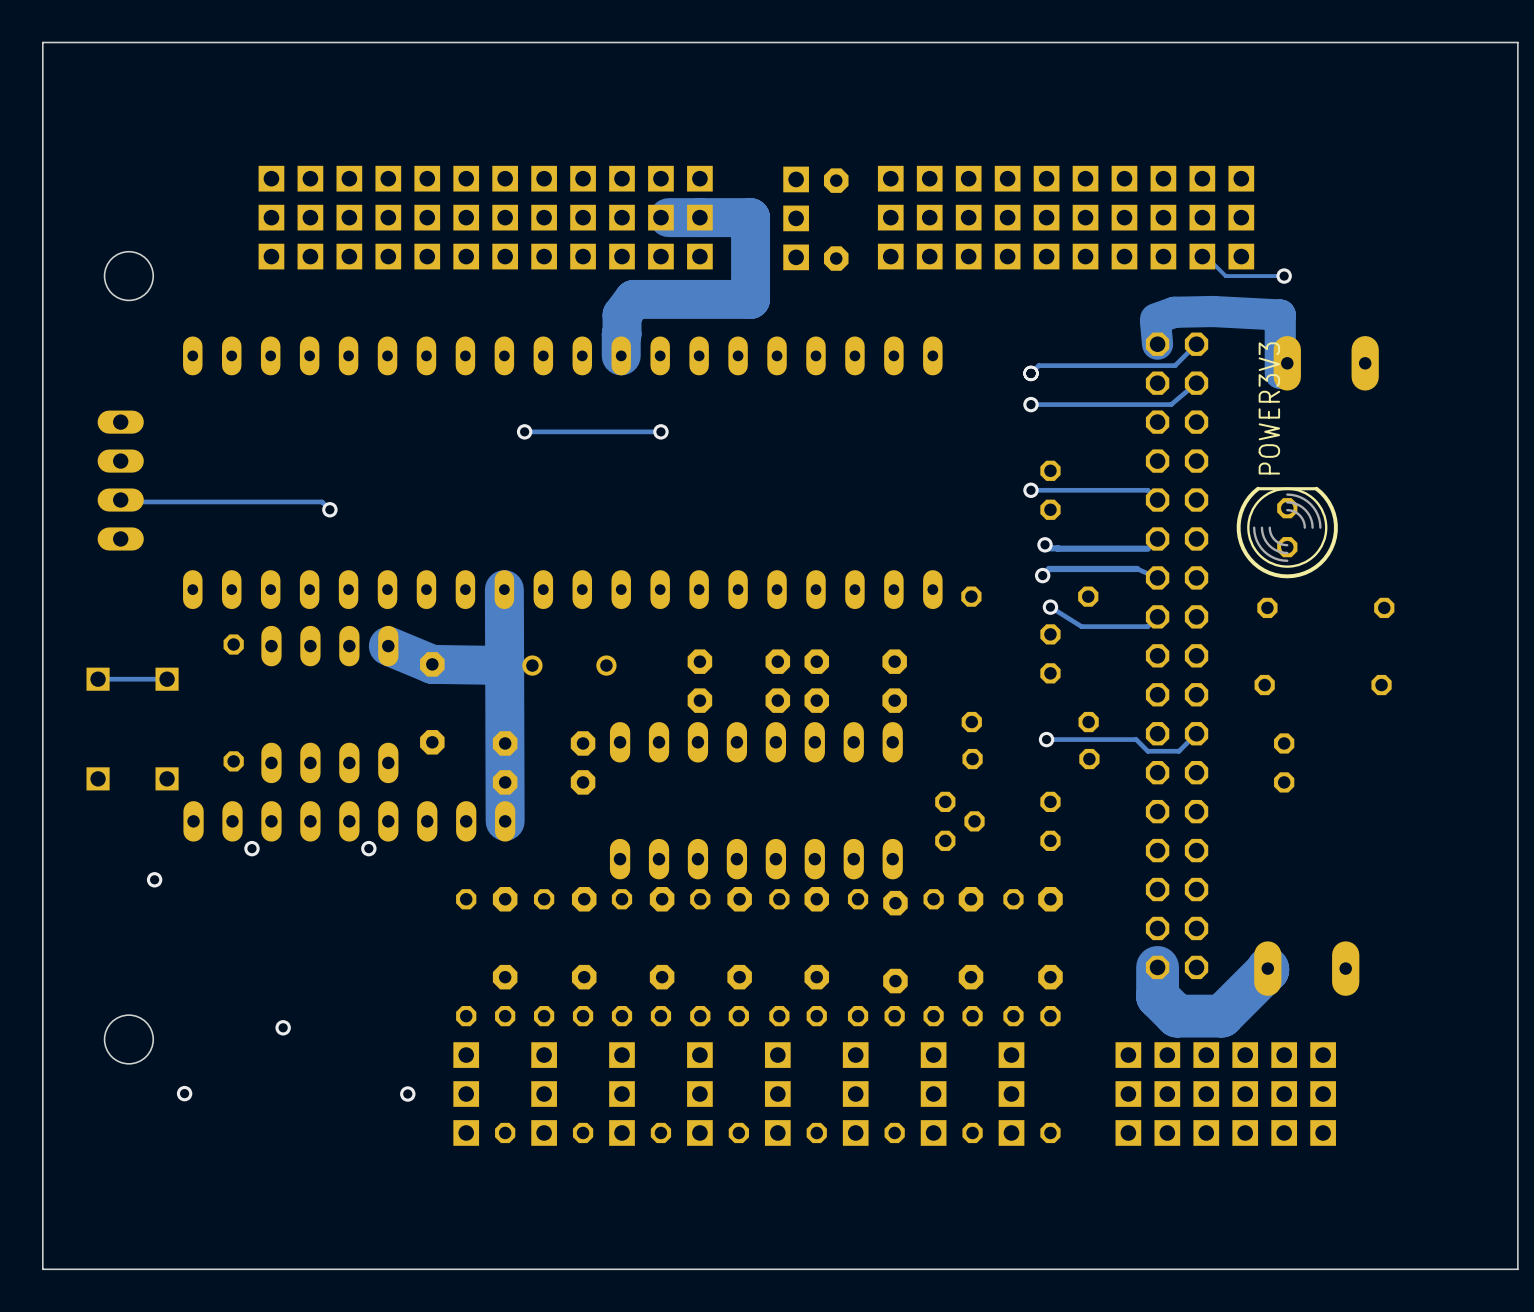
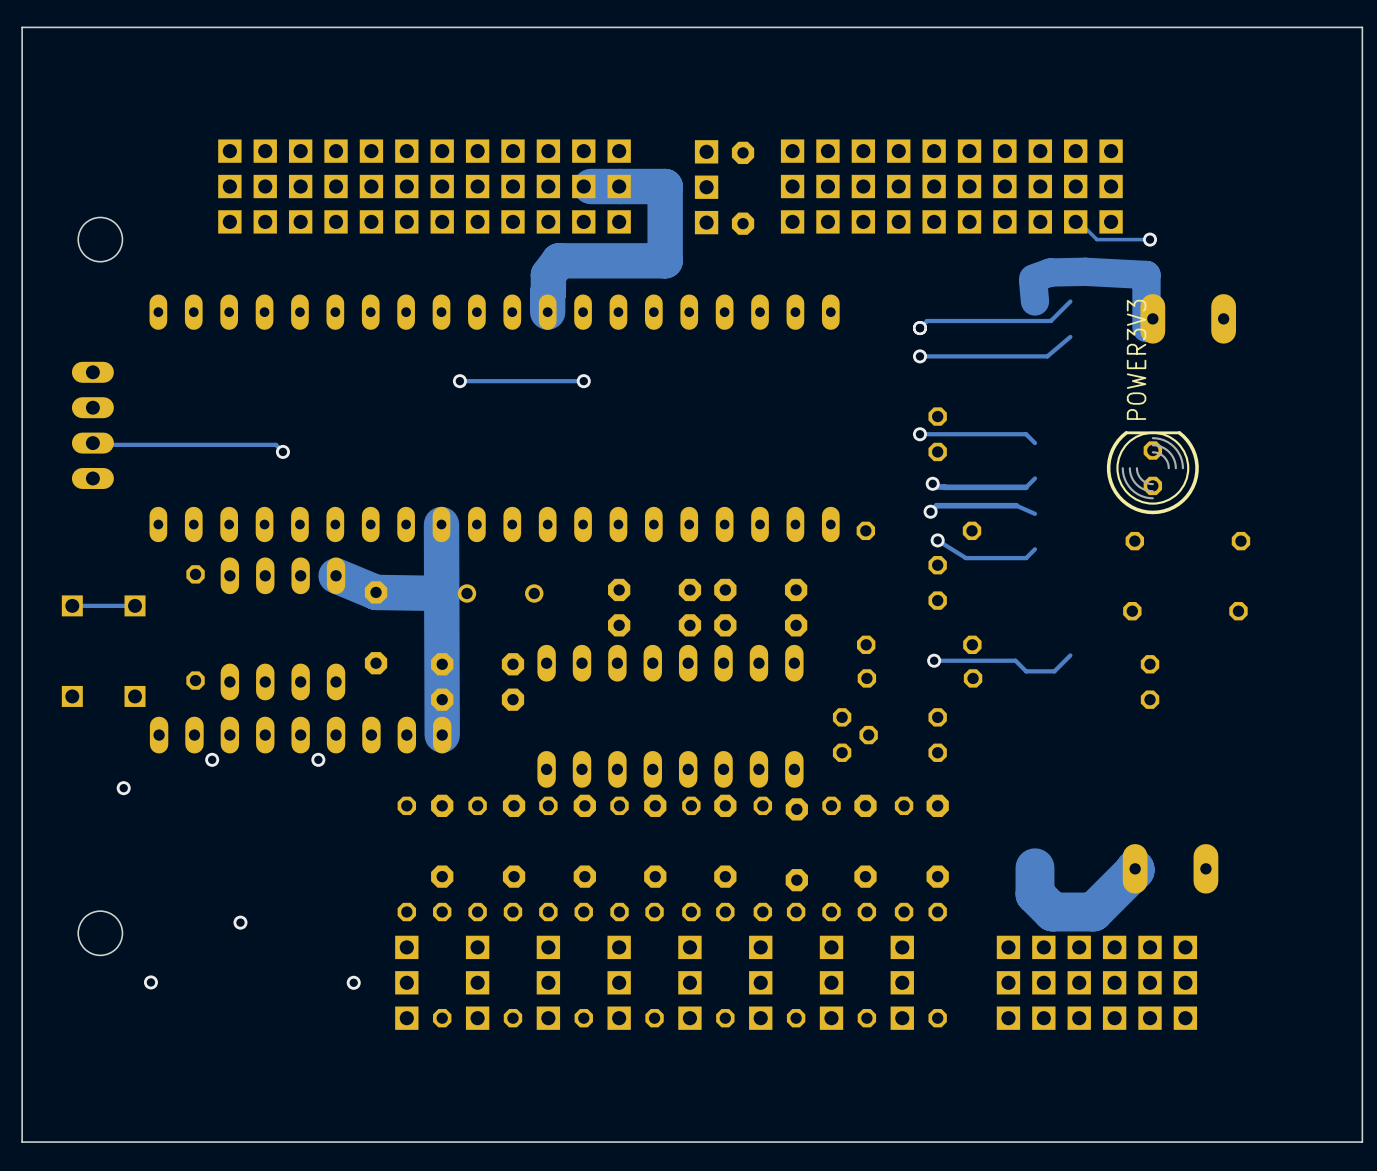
part: (1177, 655) -> none

